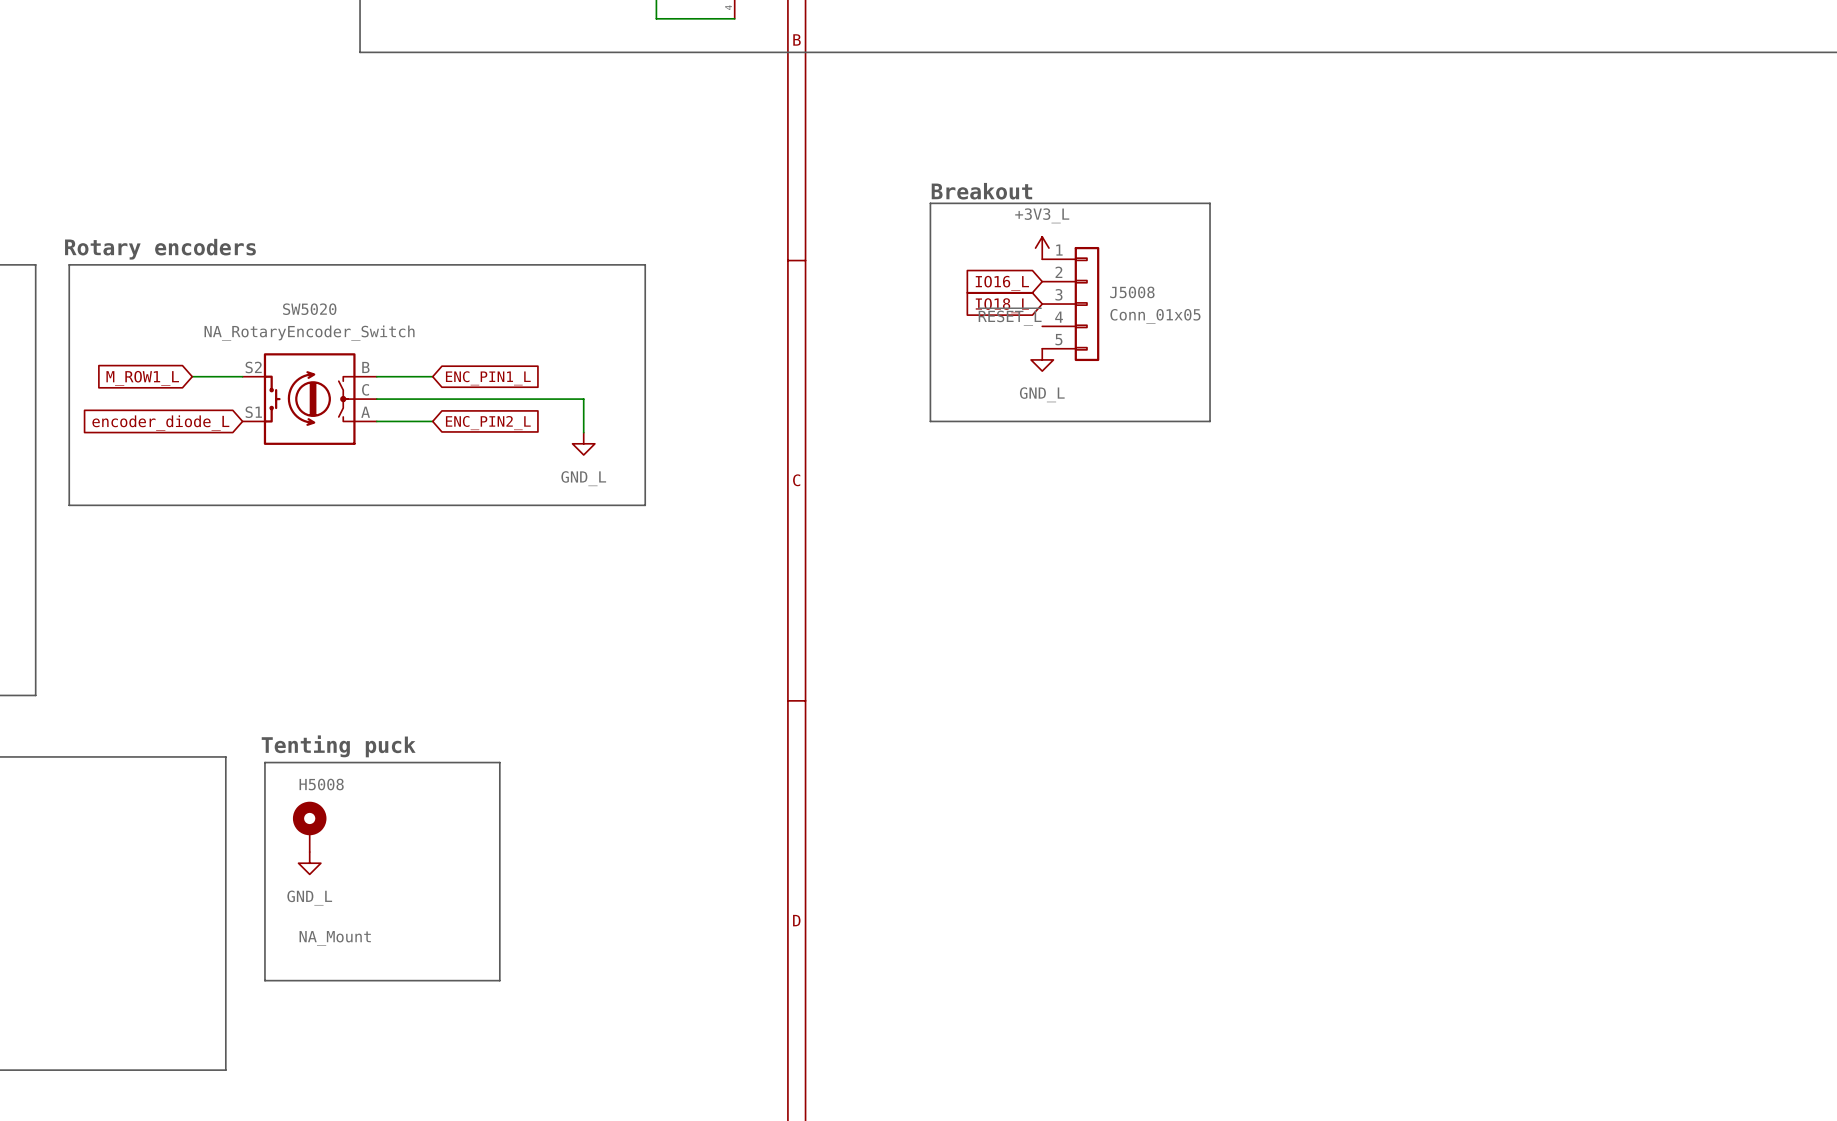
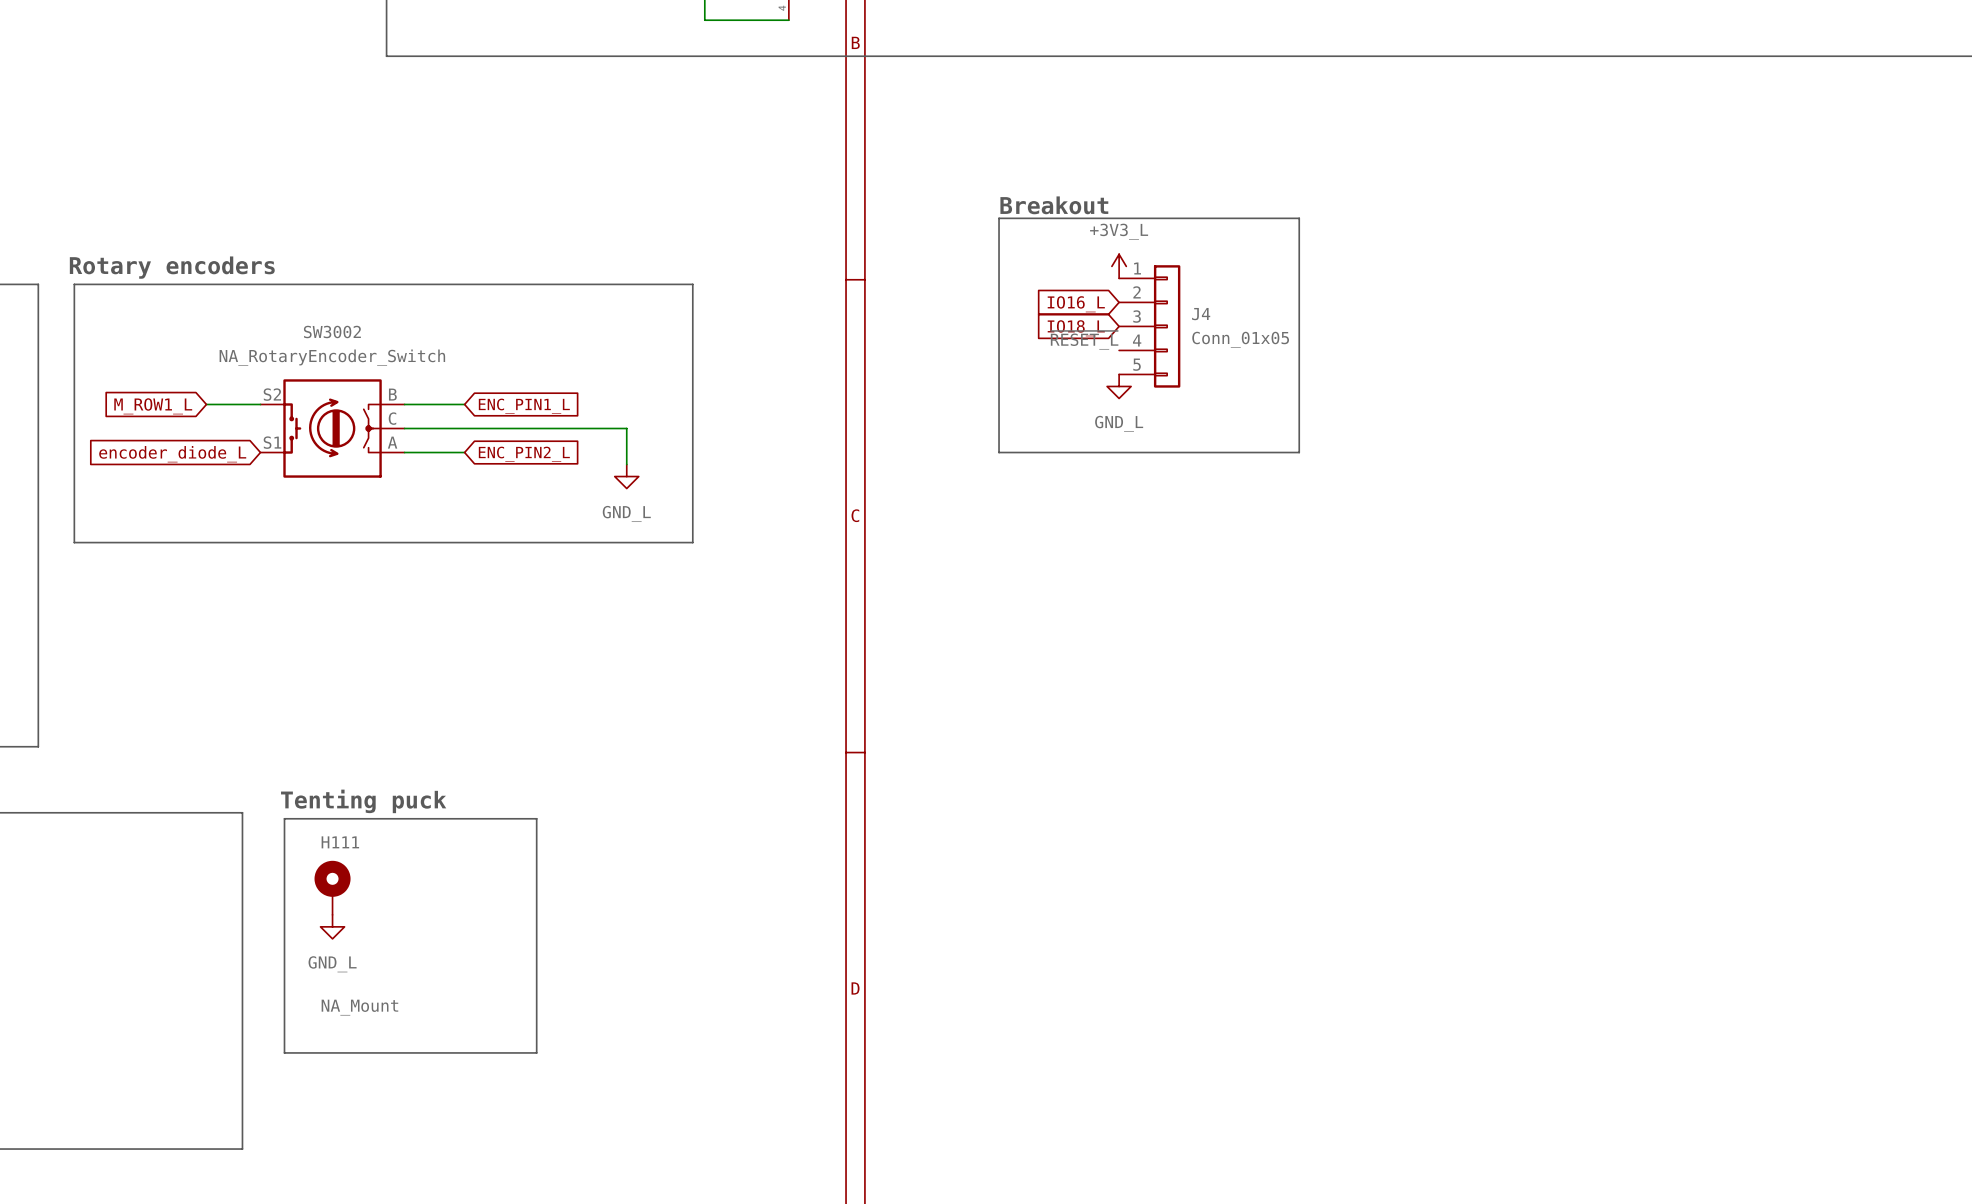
J5008 name: J5008 (1132, 292) -> J4 (1201, 314)
SW5020 name: SW5020 (309, 309) -> SW3002 (332, 331)
H5008 name: H5008 (321, 784) -> H111 (340, 842)

